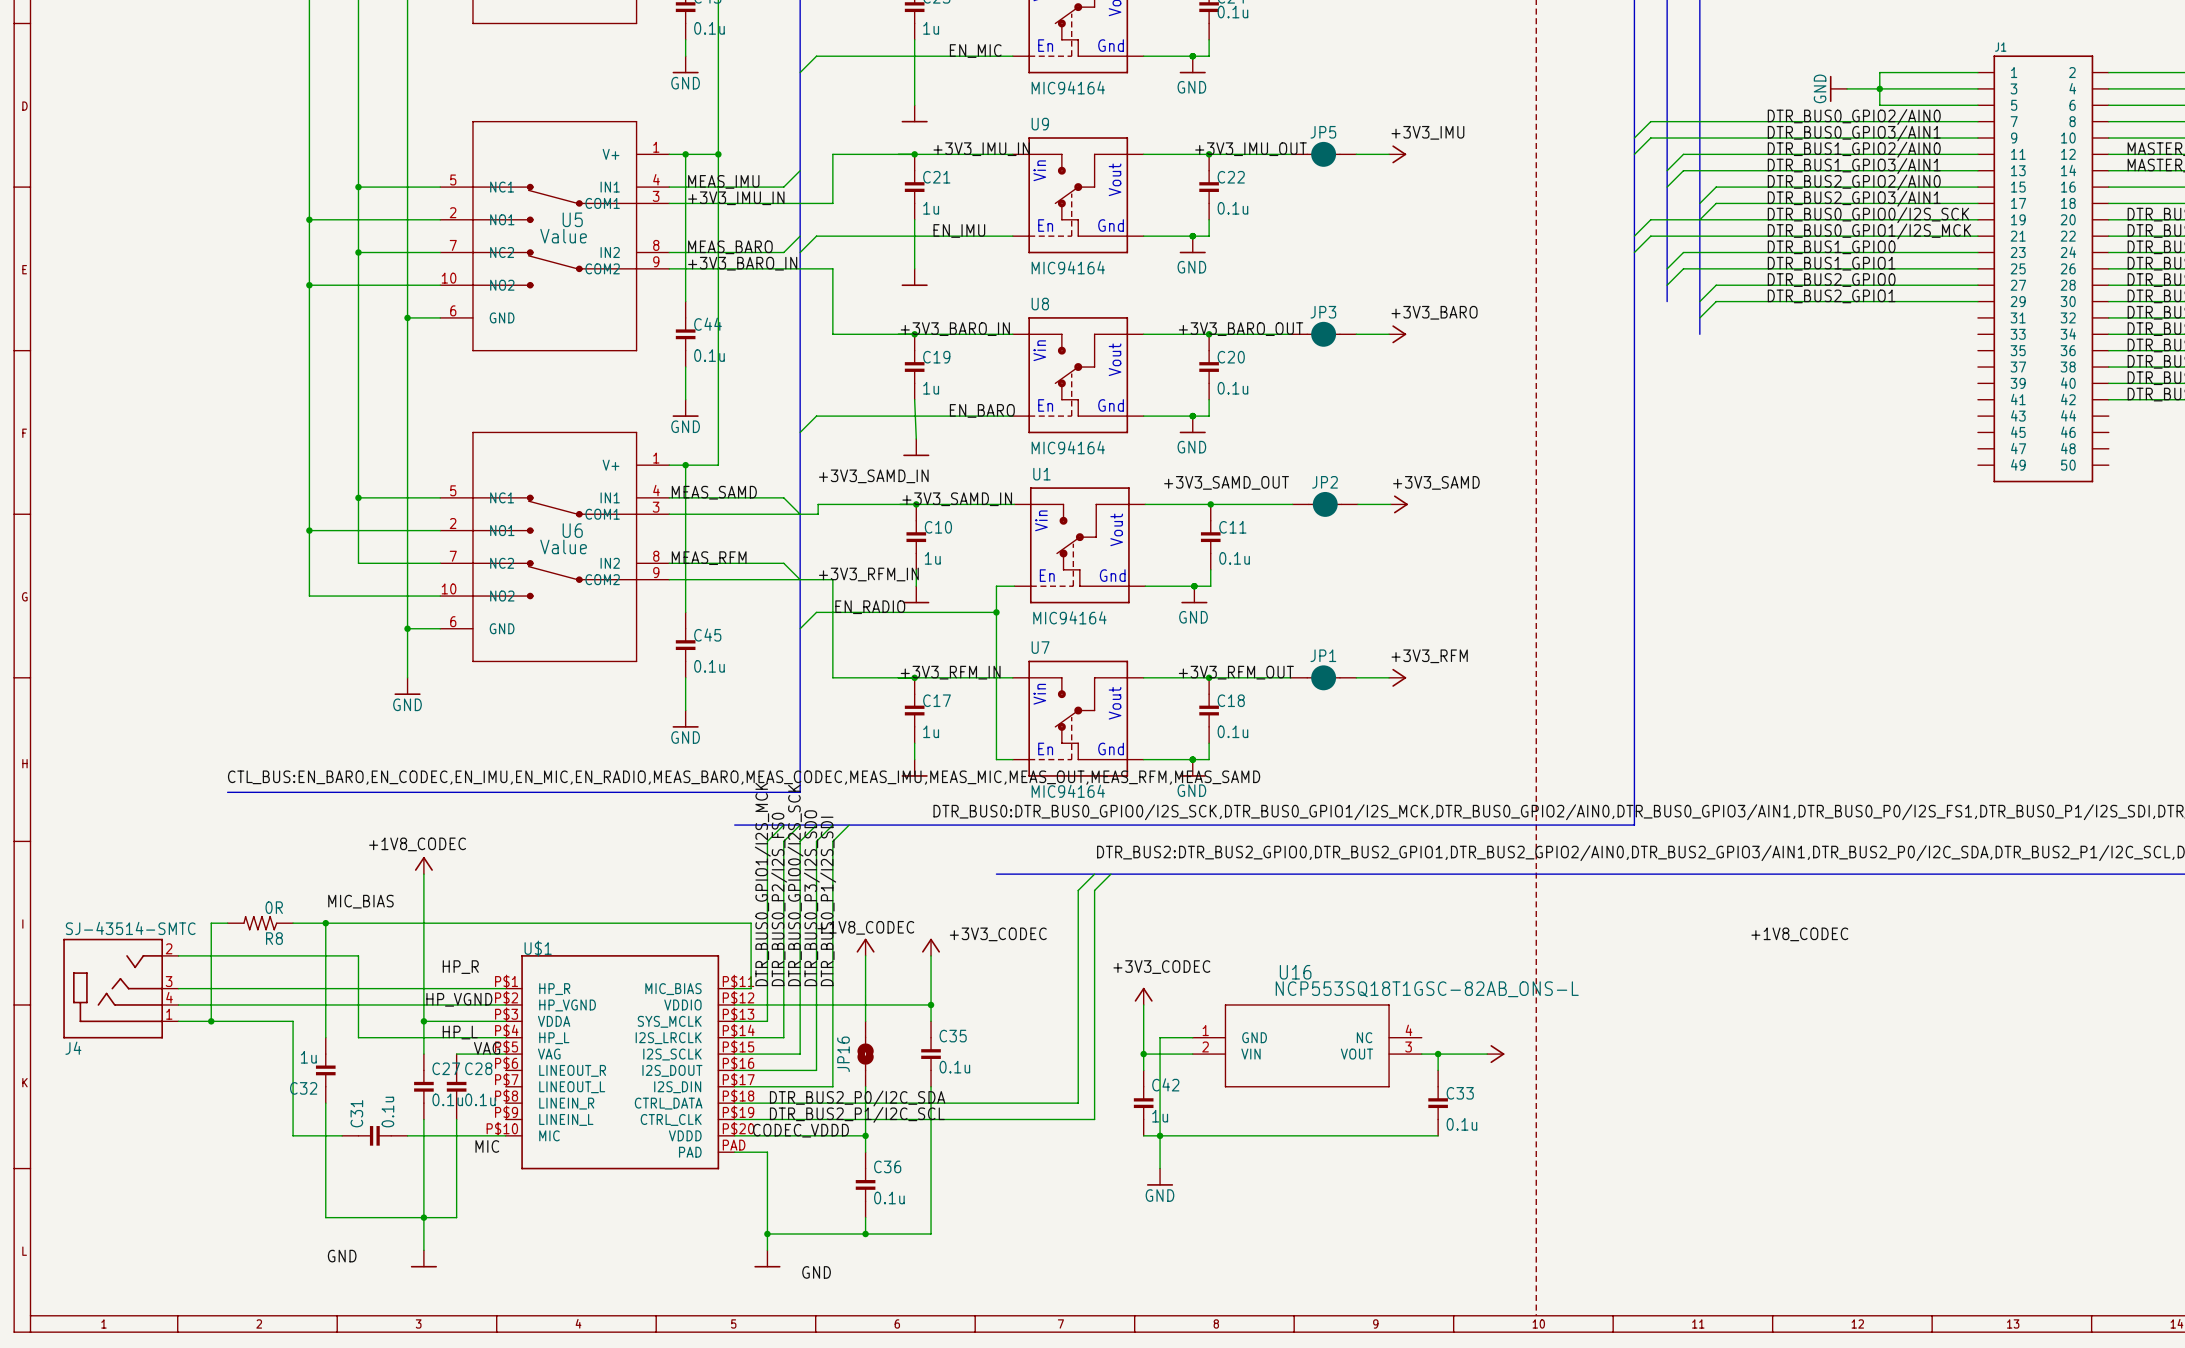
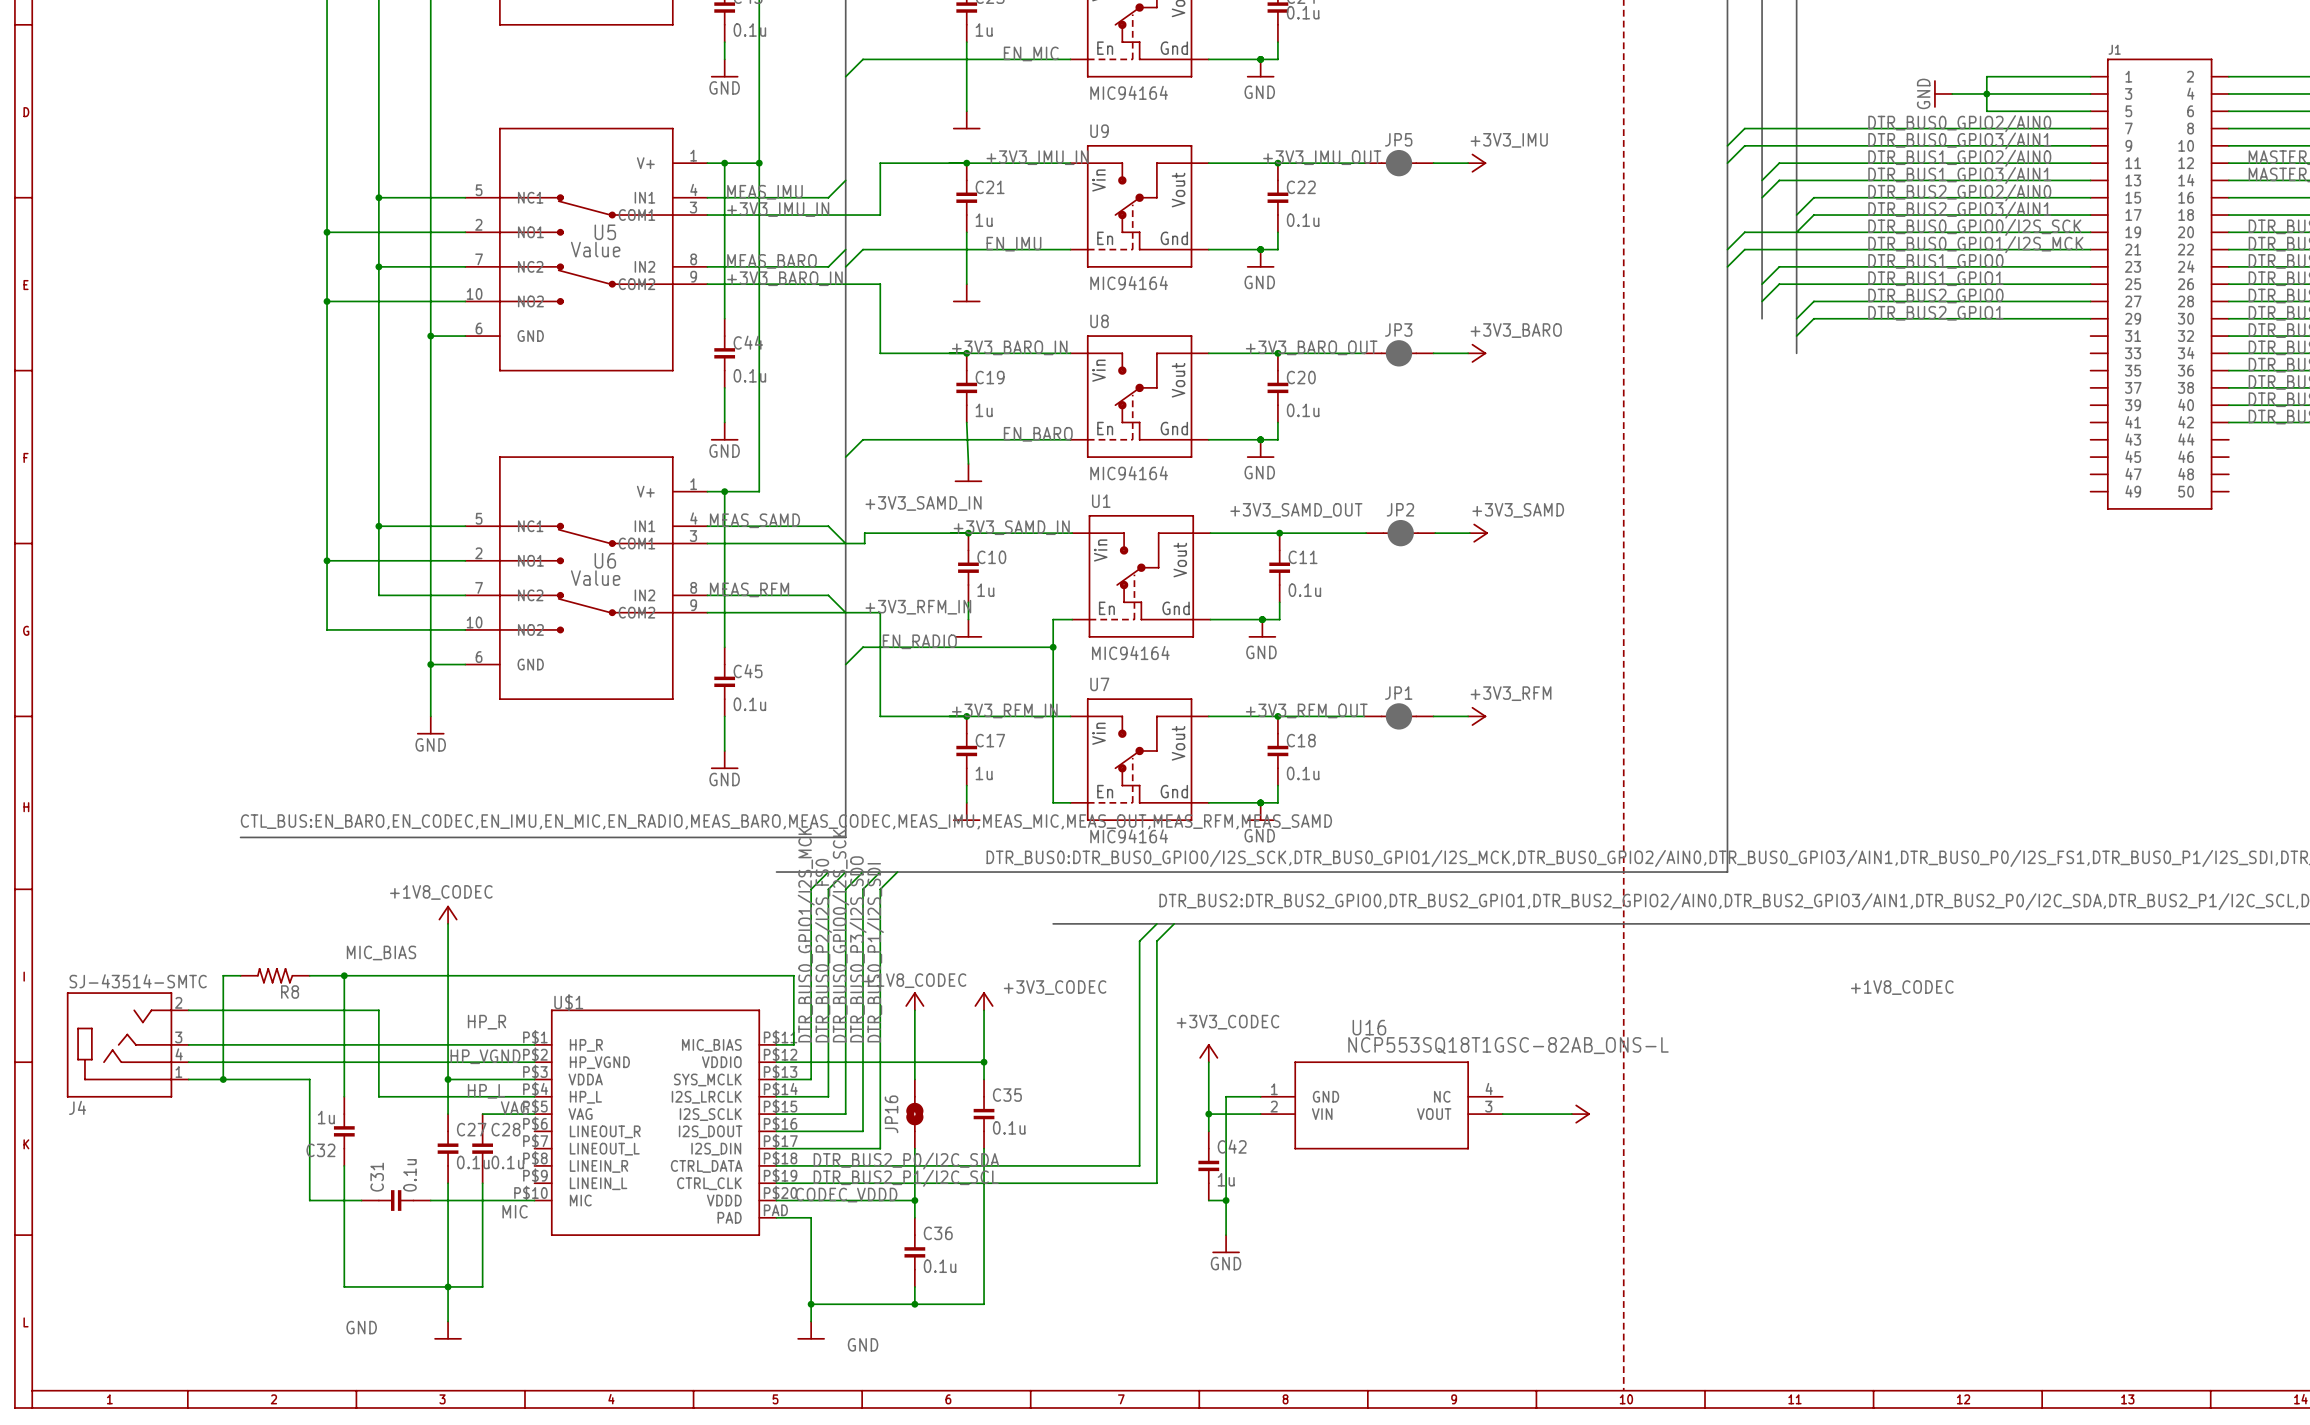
R8 value: 0R (274, 907) -> none
wire: (1438, 1054) (1438, 1070) -> none
junction: (1438, 1054) -> none
C33: 0.1u (1438, 1103) -> none
wire: (1160, 1135) (1438, 1135) -> none

